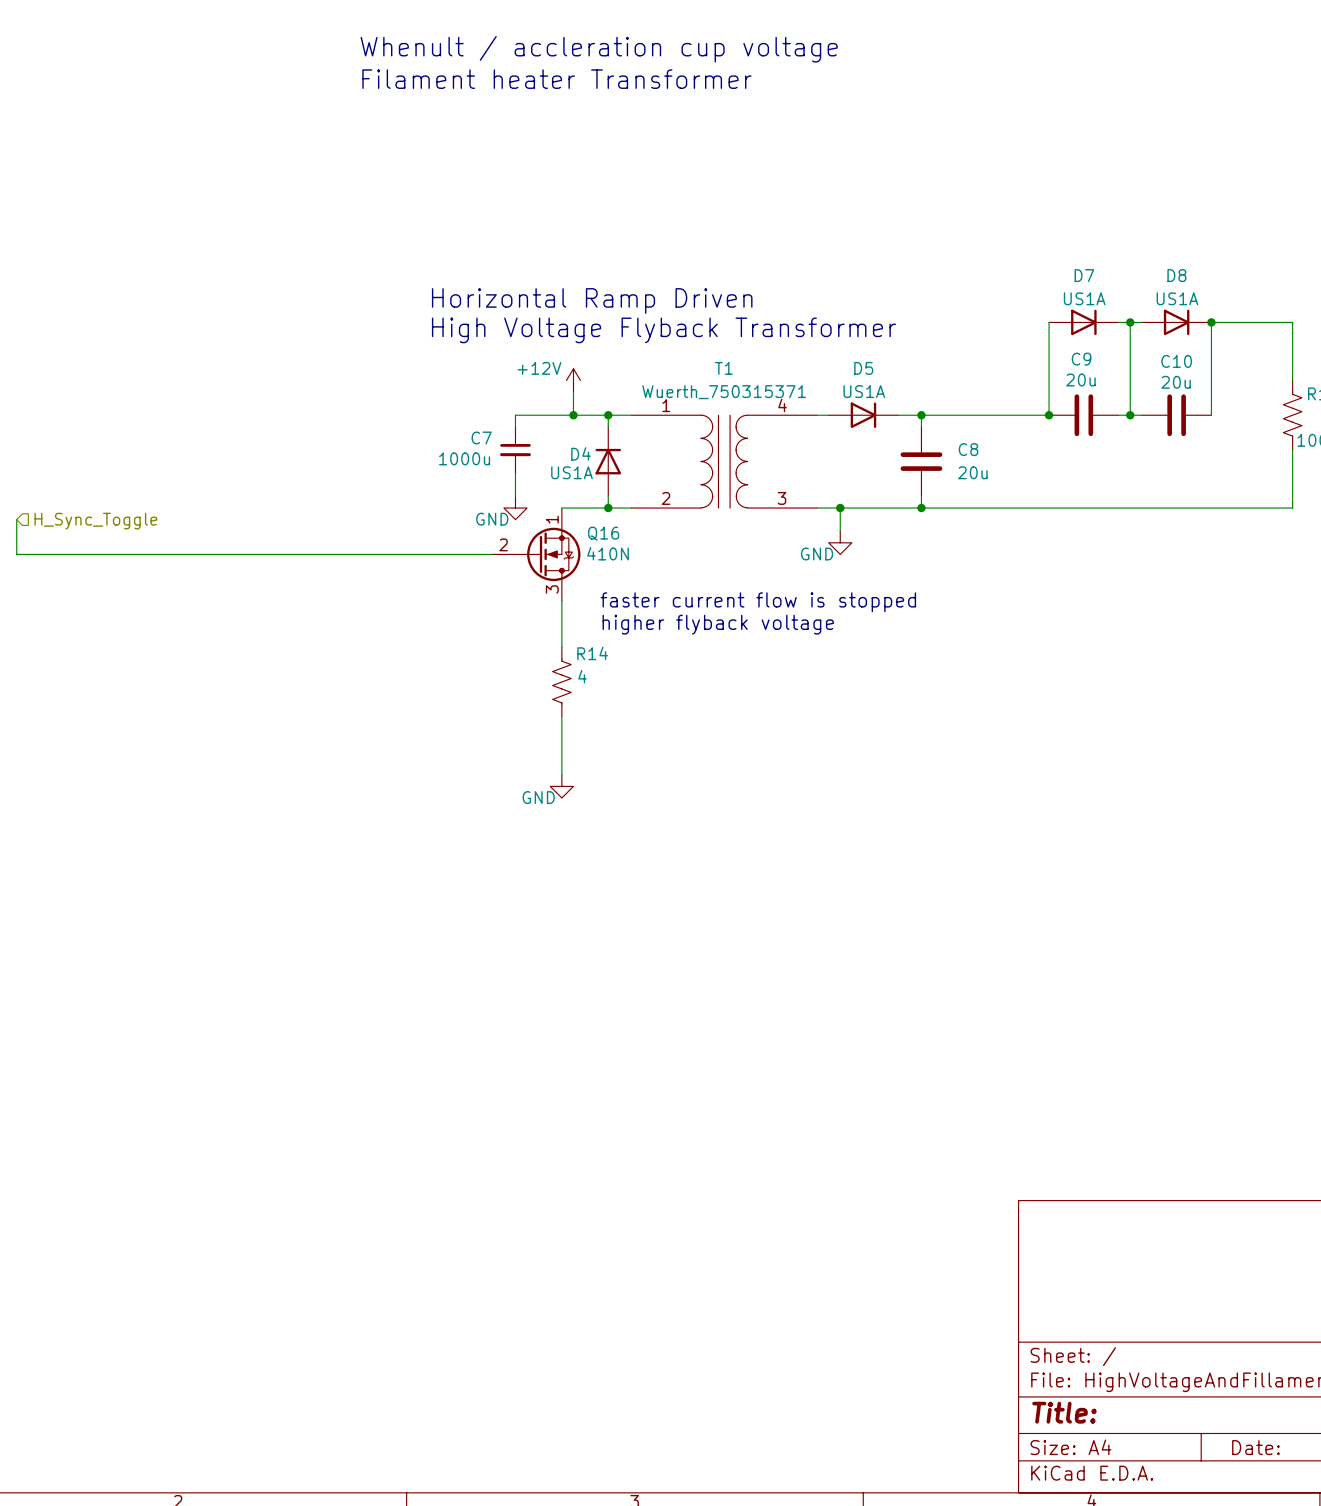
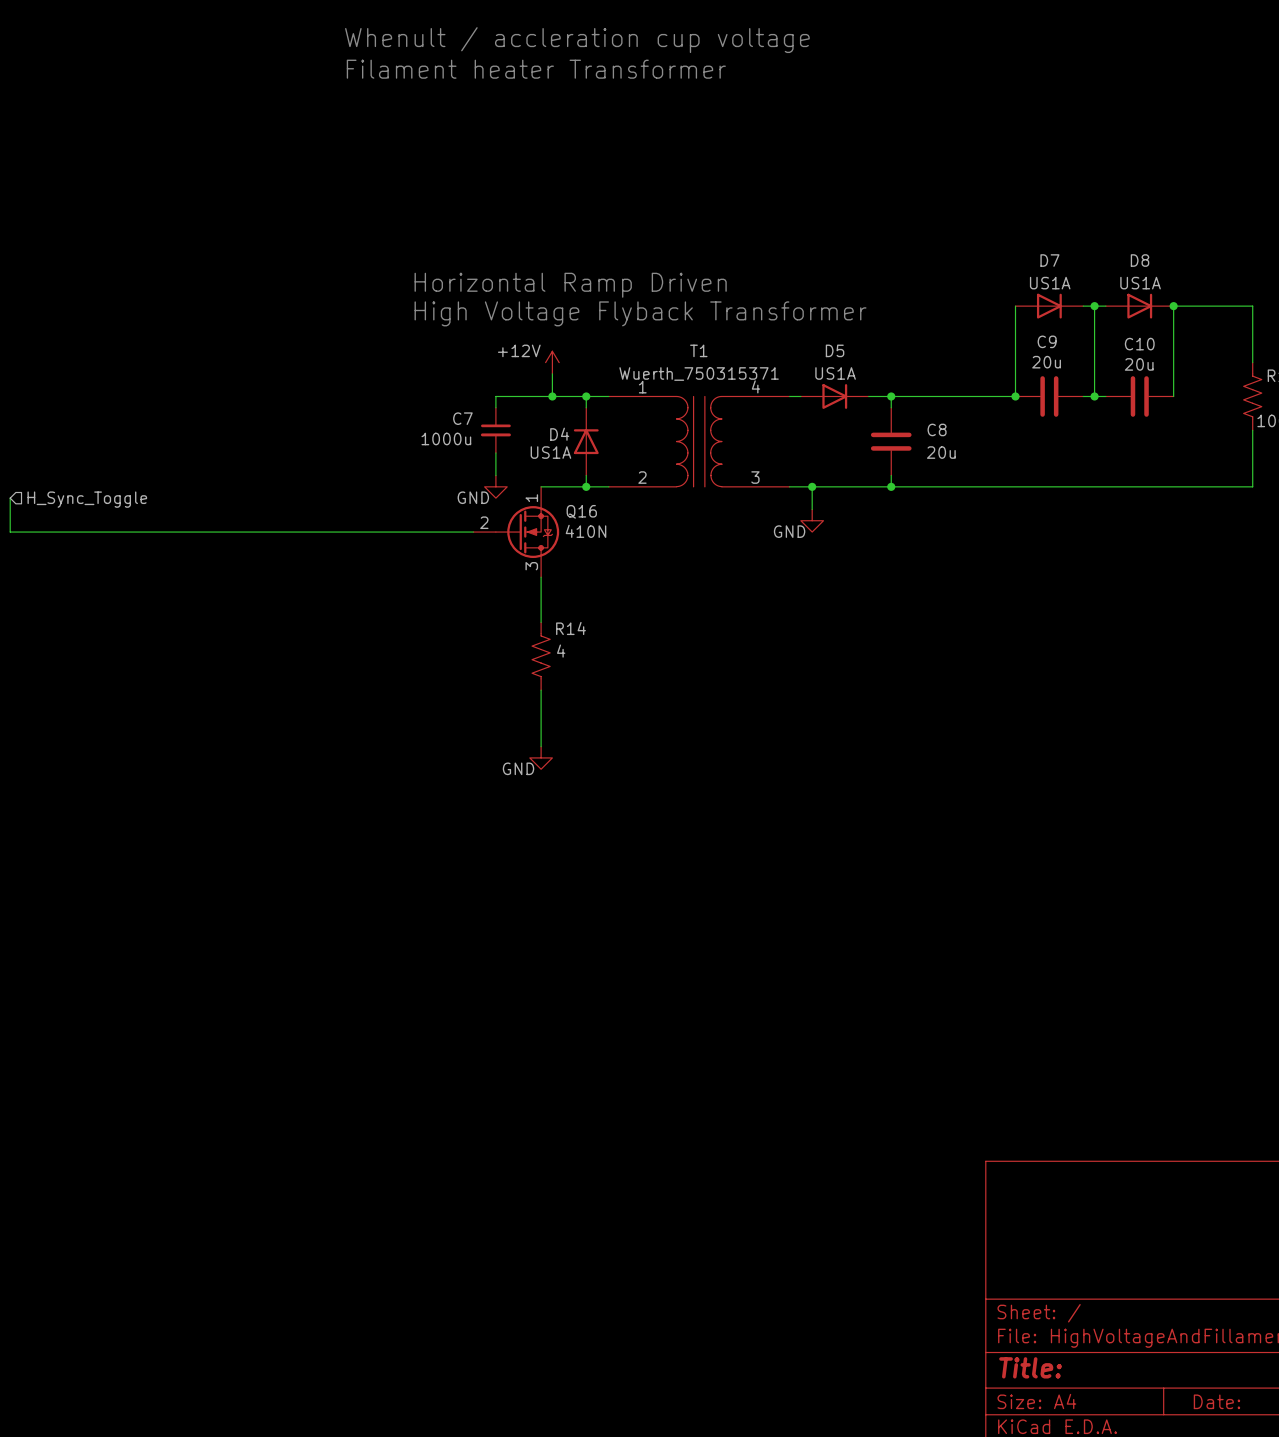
text: faster current flow is stopped (758, 602) -> none
text: higher flyback voltage (718, 624) -> none

